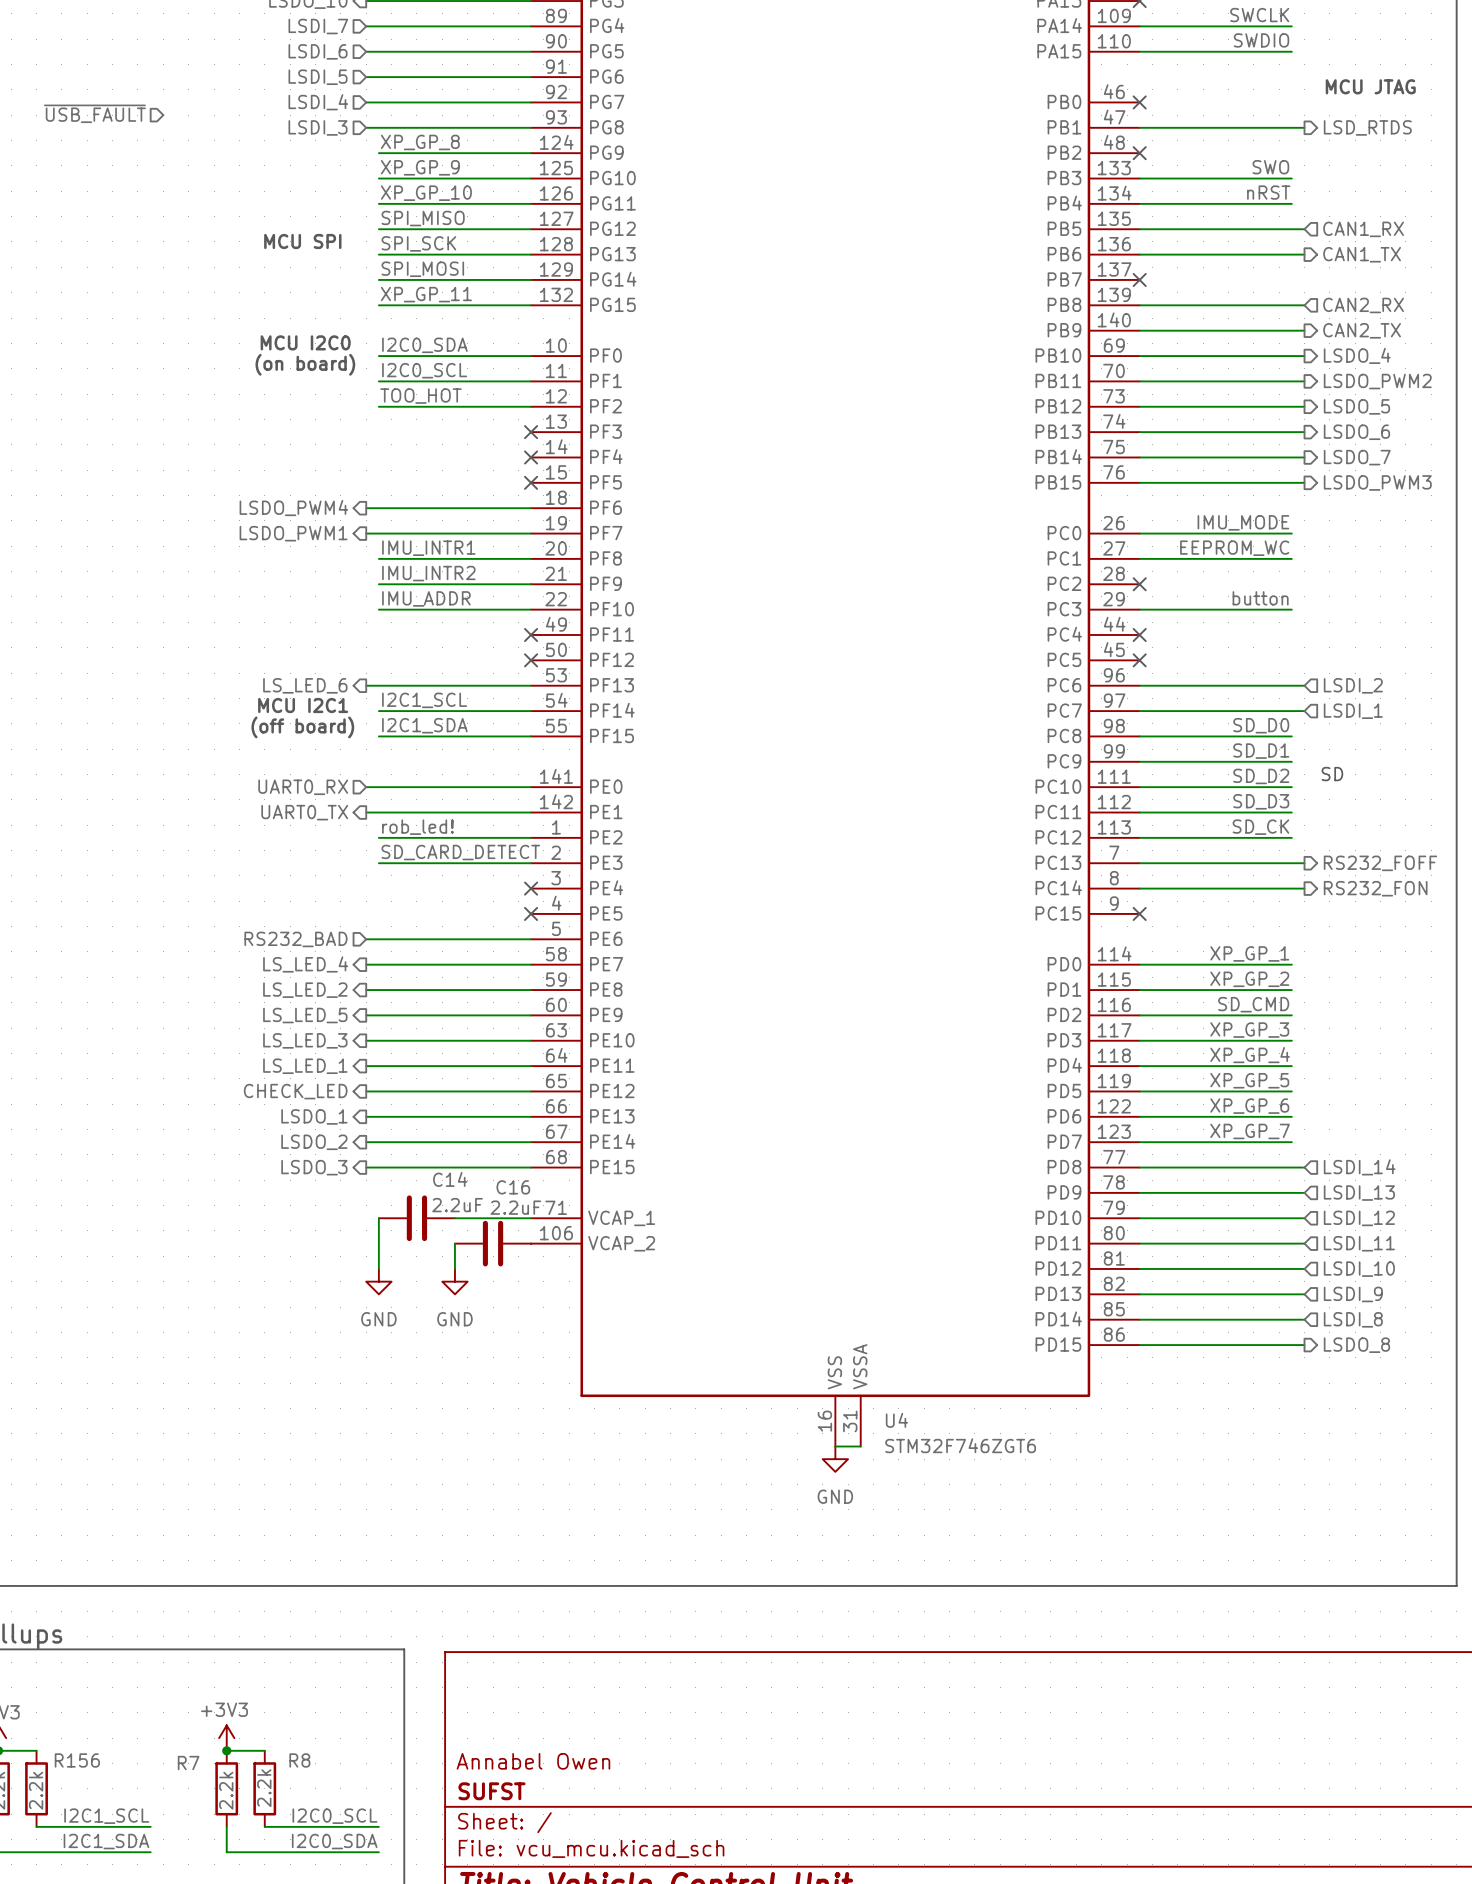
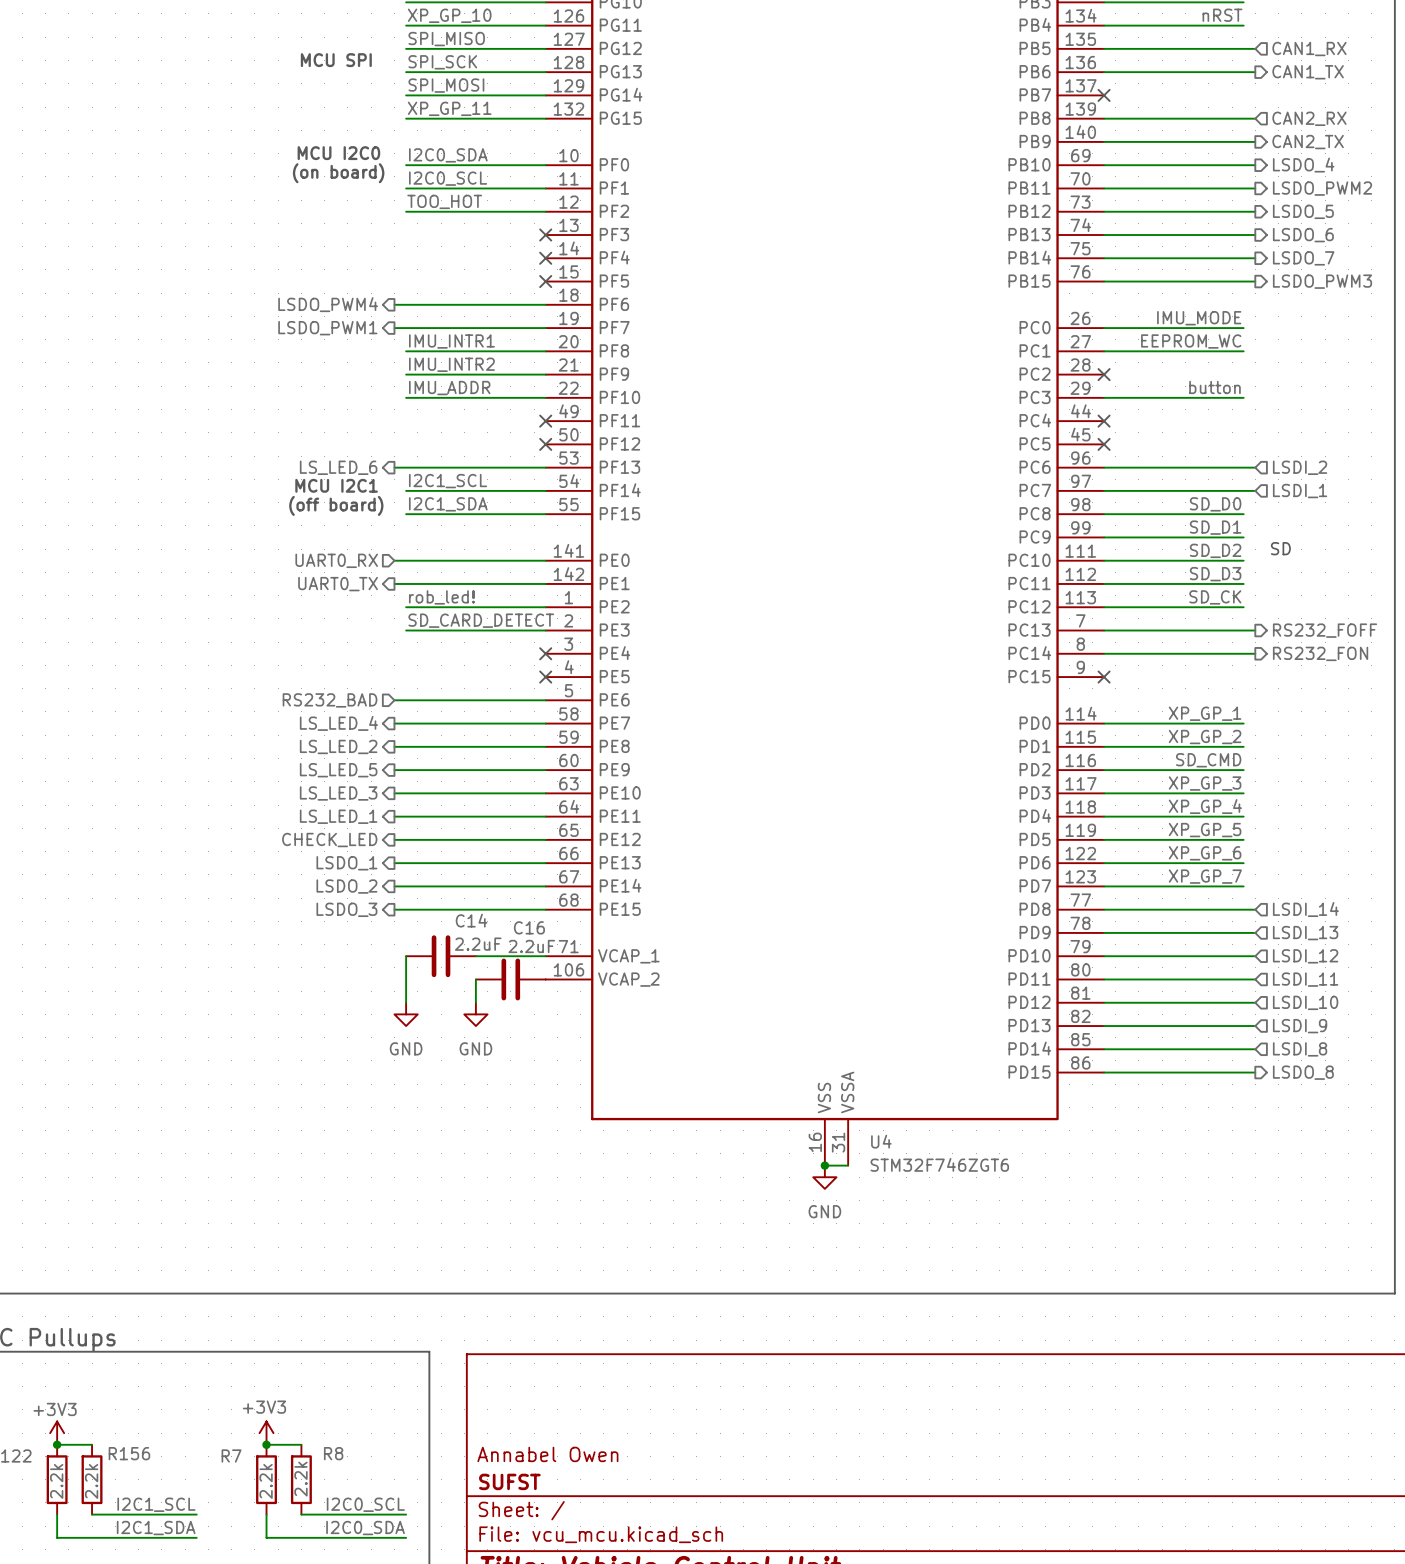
junction: none -> (824, 1165)

